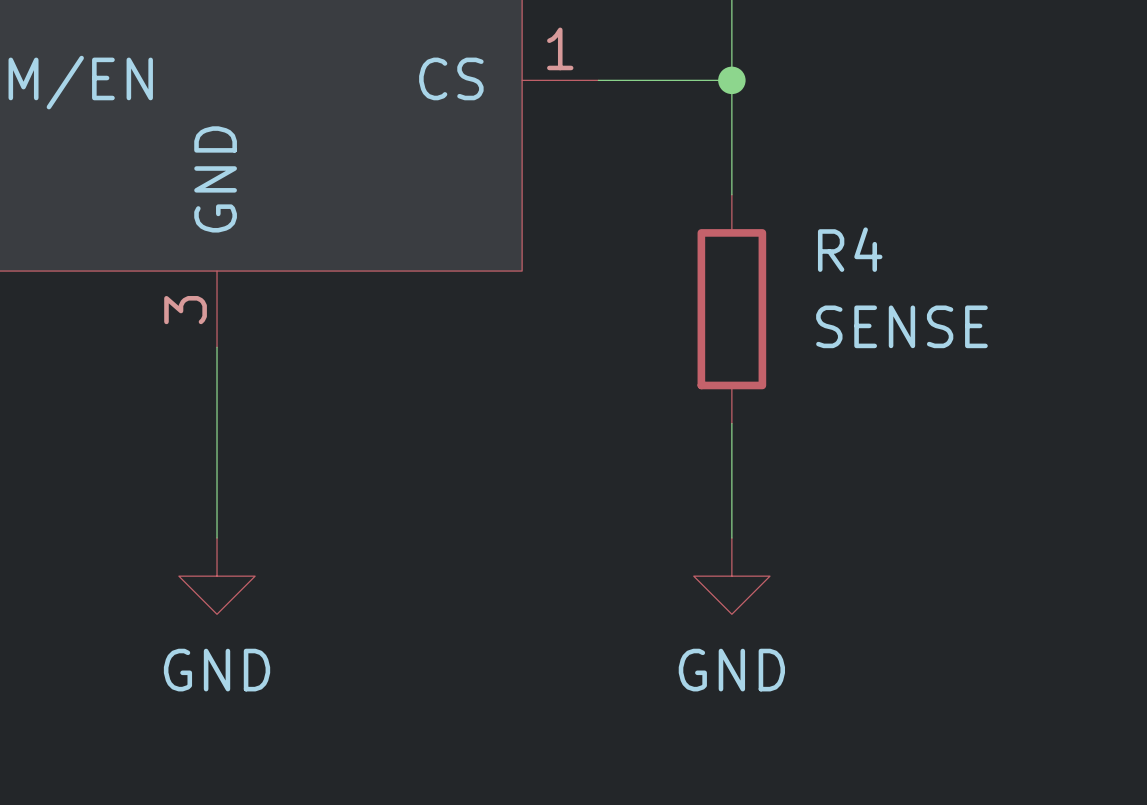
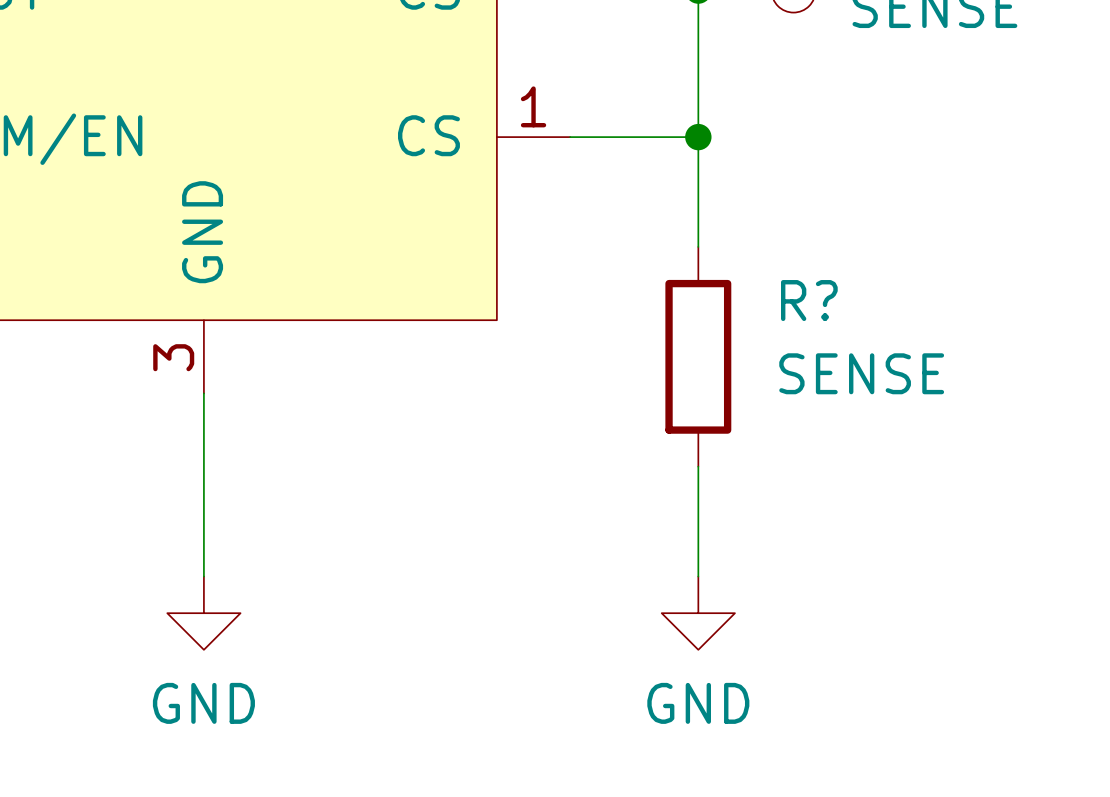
R4 name: R4 (850, 249) -> R? (809, 300)

